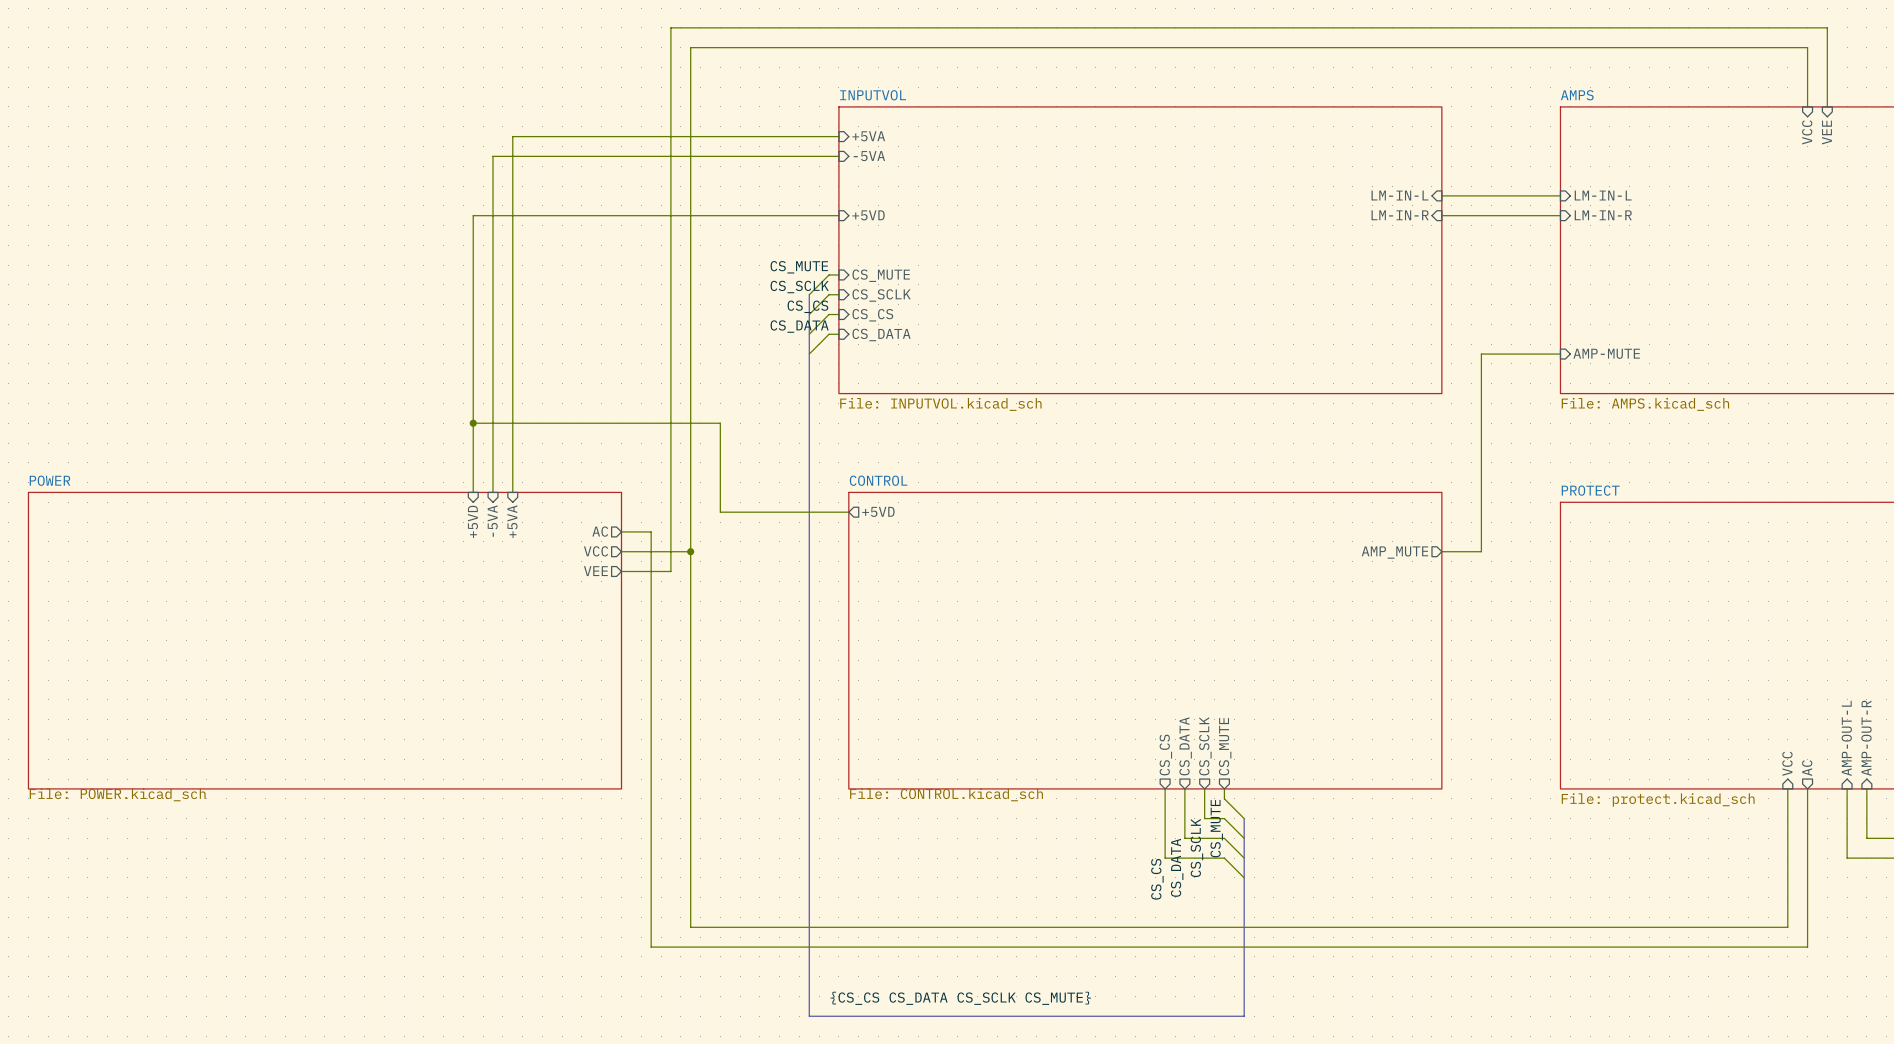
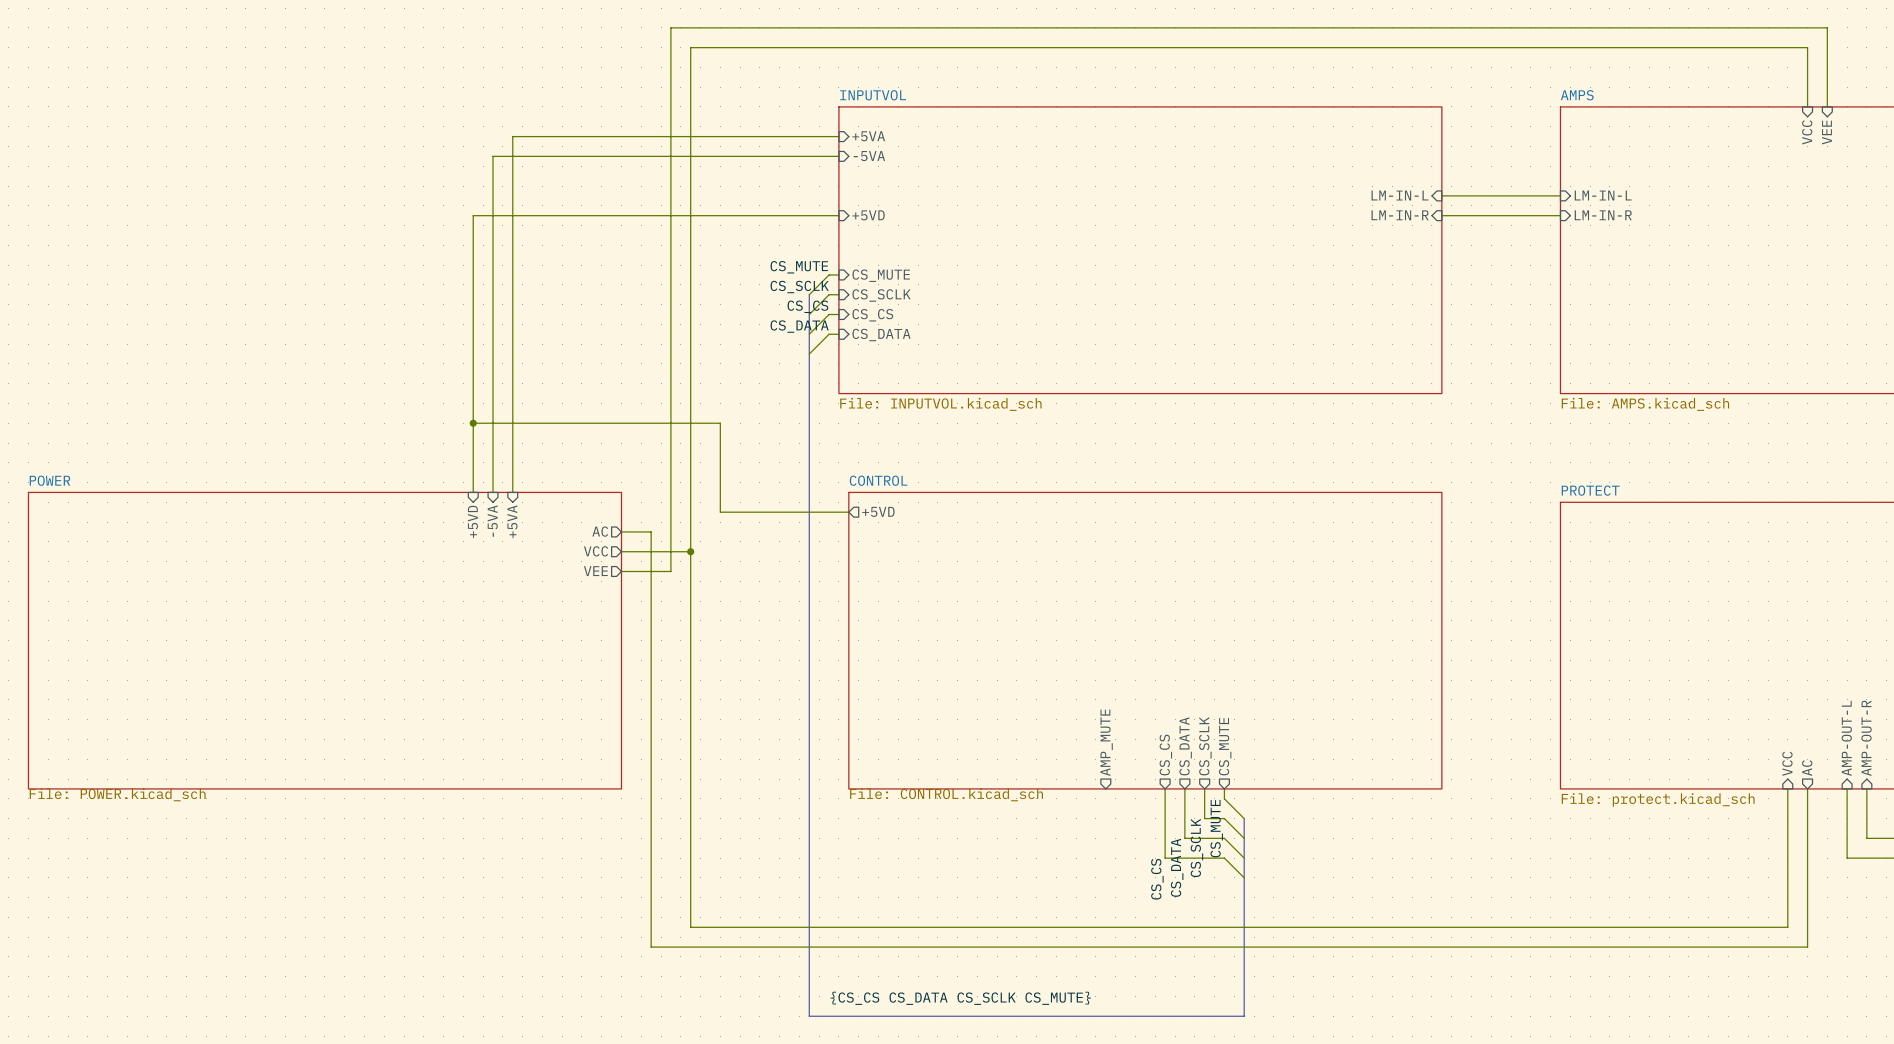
sheet pin: AMP-MUTE (1606, 353) -> none
wire: (1560, 354) (1481, 354) (1481, 551) (1441, 551) -> none
sheet pin: AMP_MUTE (1394, 552) -> none
sheet pin: none -> AMP_MUTE (1106, 742)

